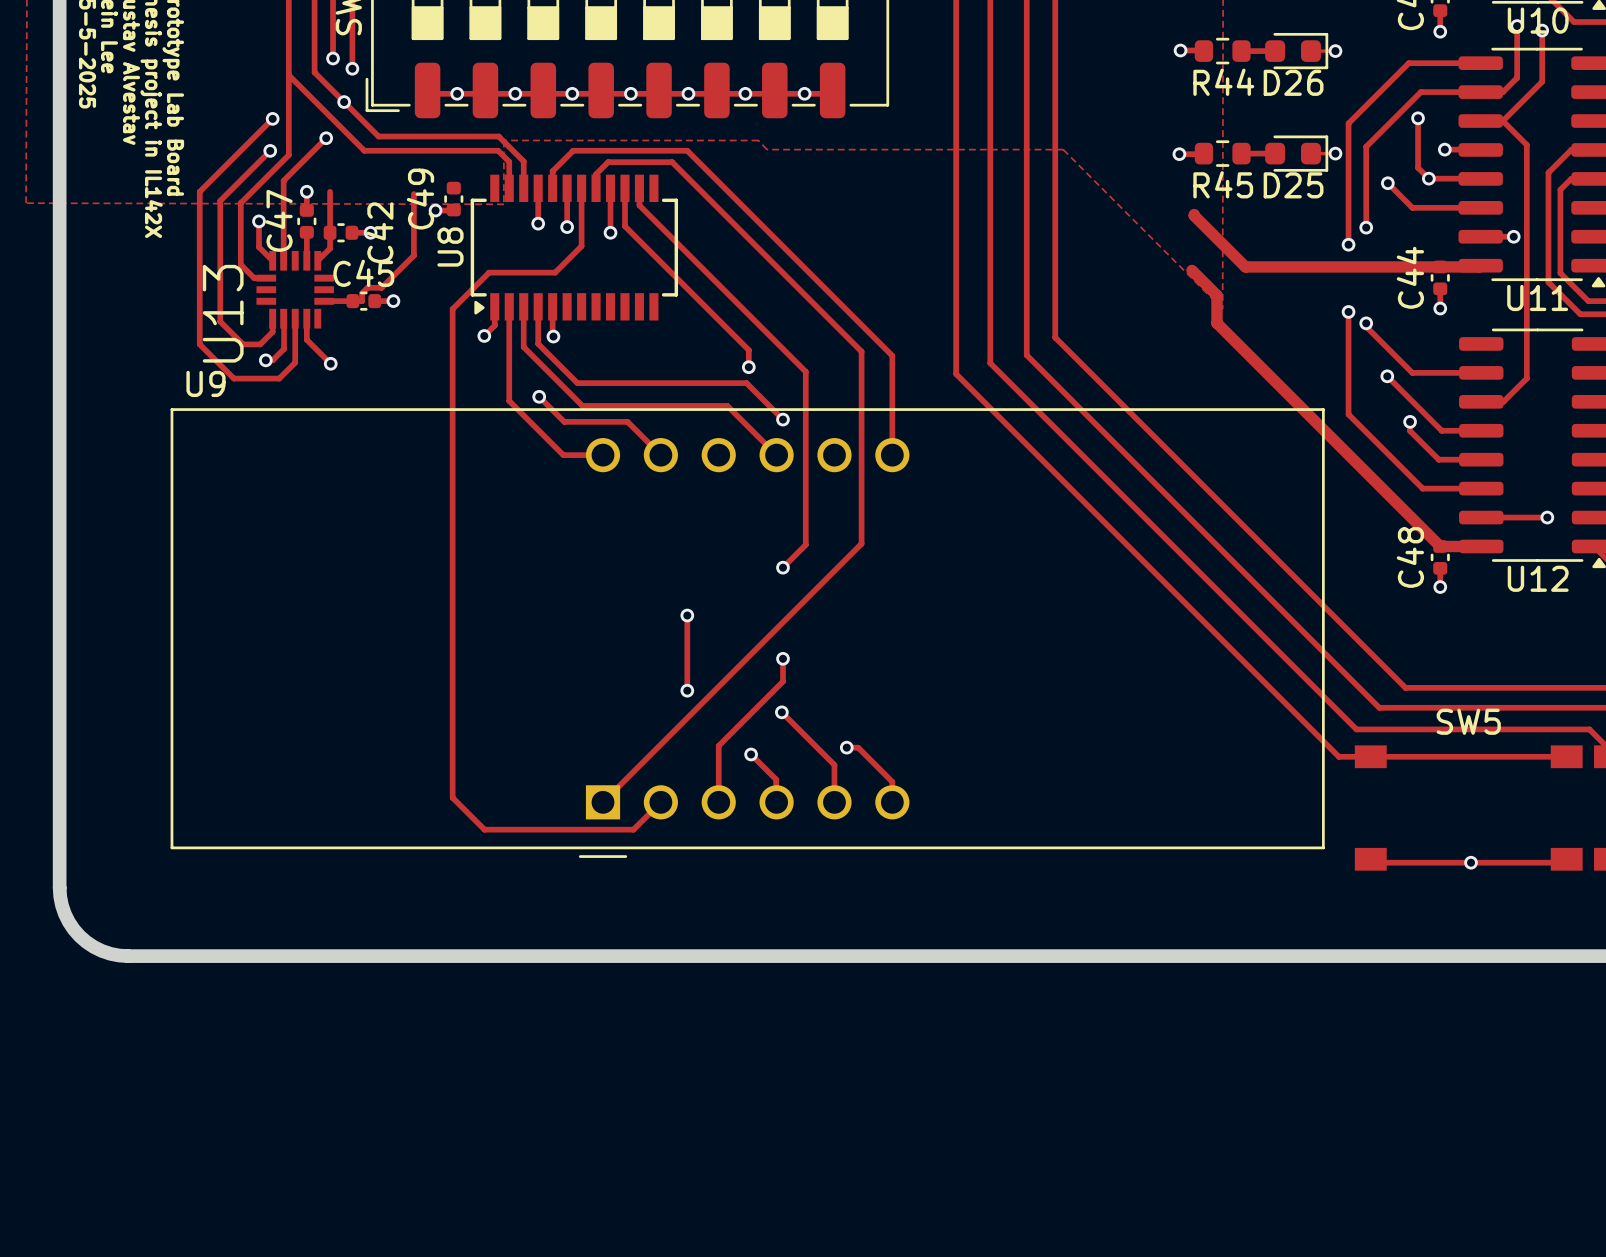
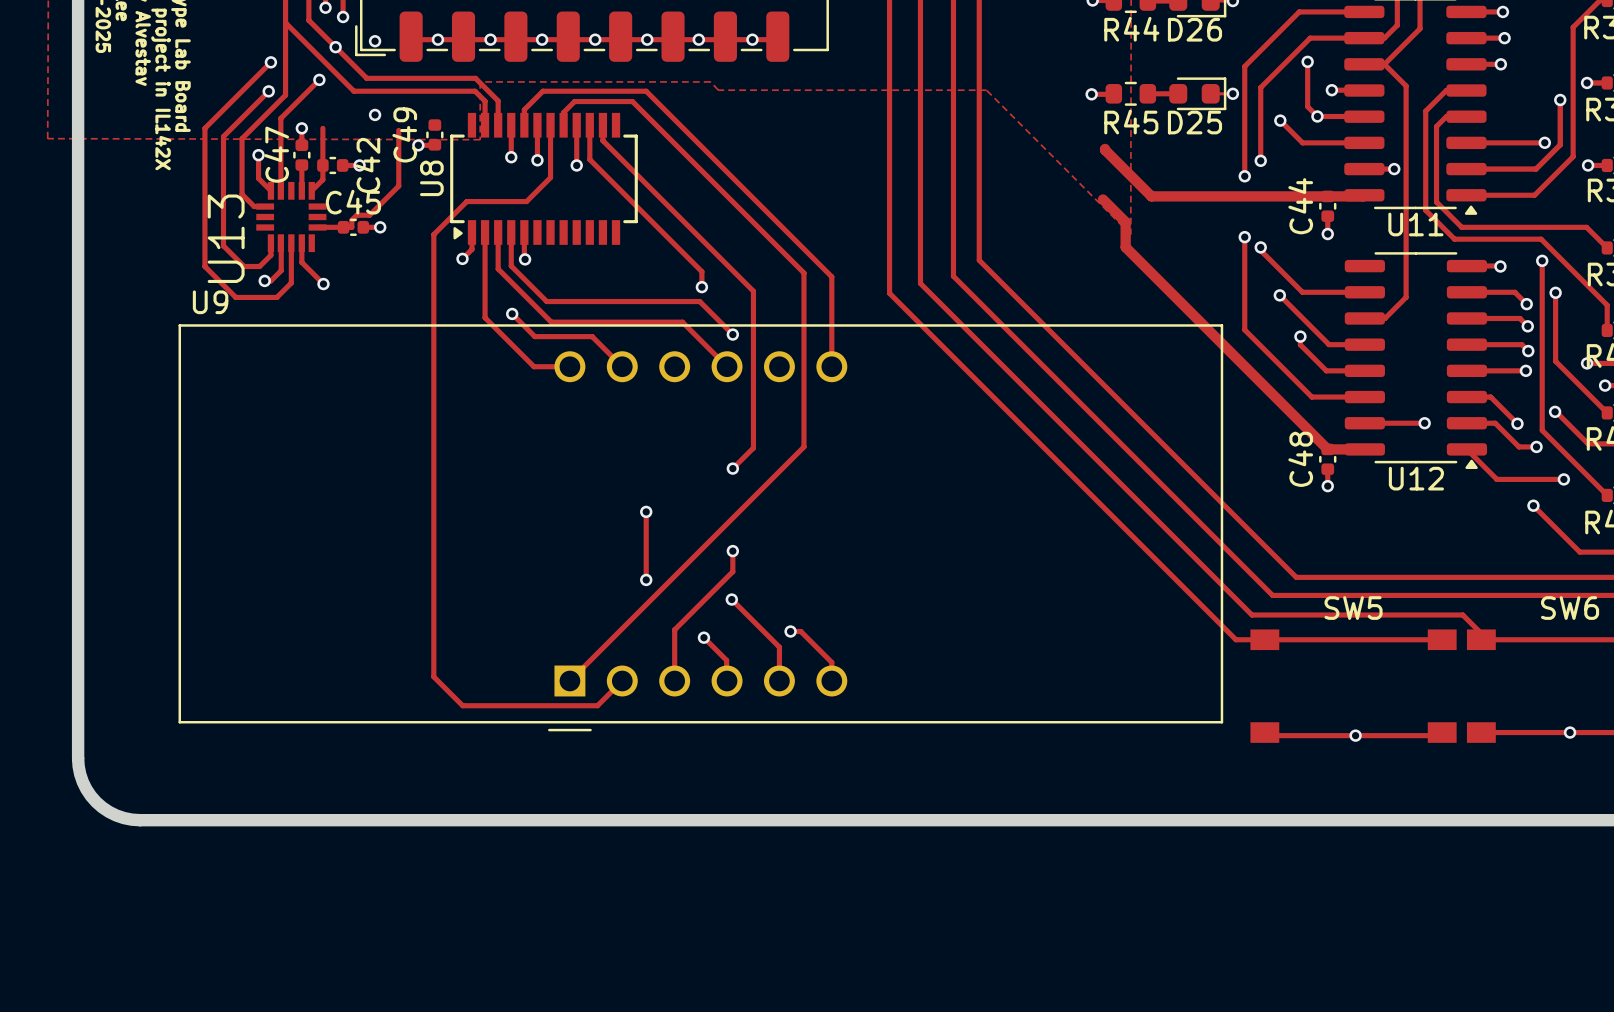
via: none -> (375, 41)
via: none -> (375, 114)

